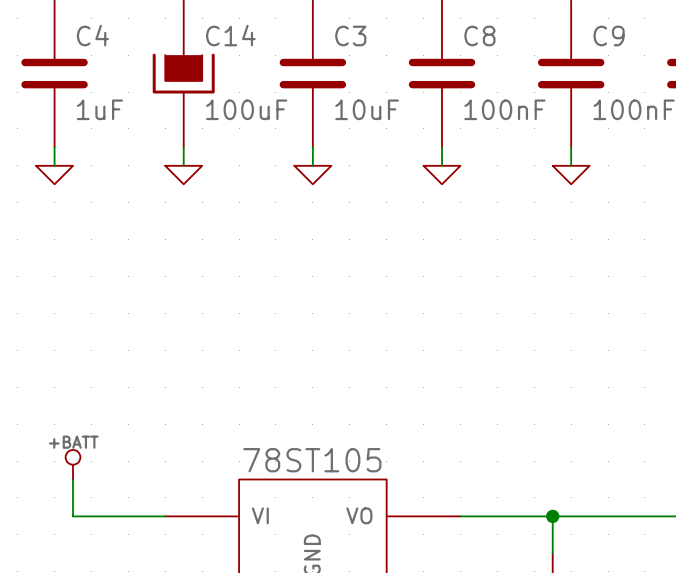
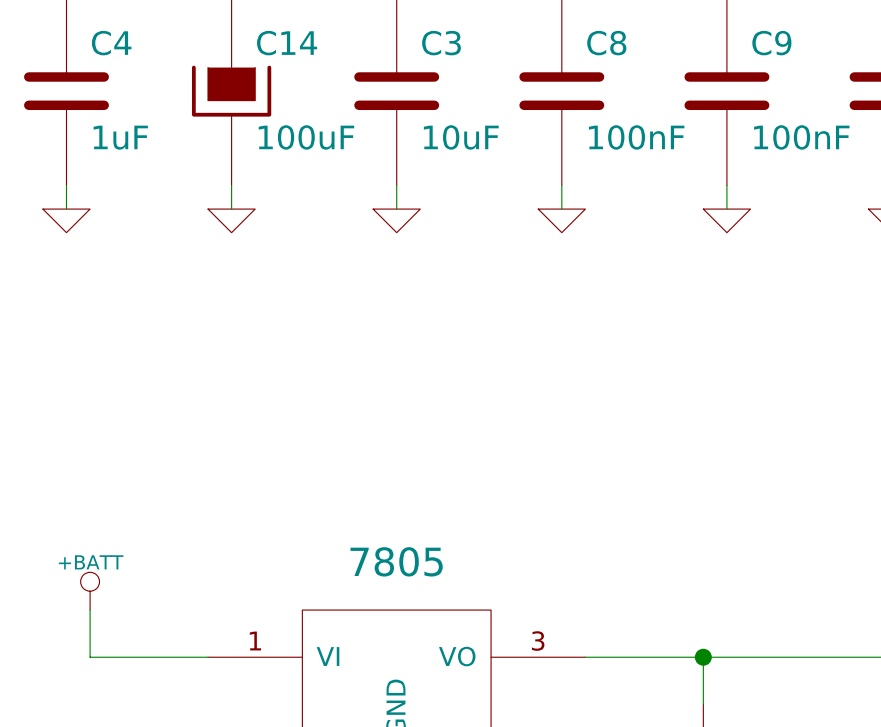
part value: 78ST105 (312, 460) -> 7805 (396, 561)
part pin number: none -> 1 (255, 641)
part pin number: none -> 3 (538, 641)

